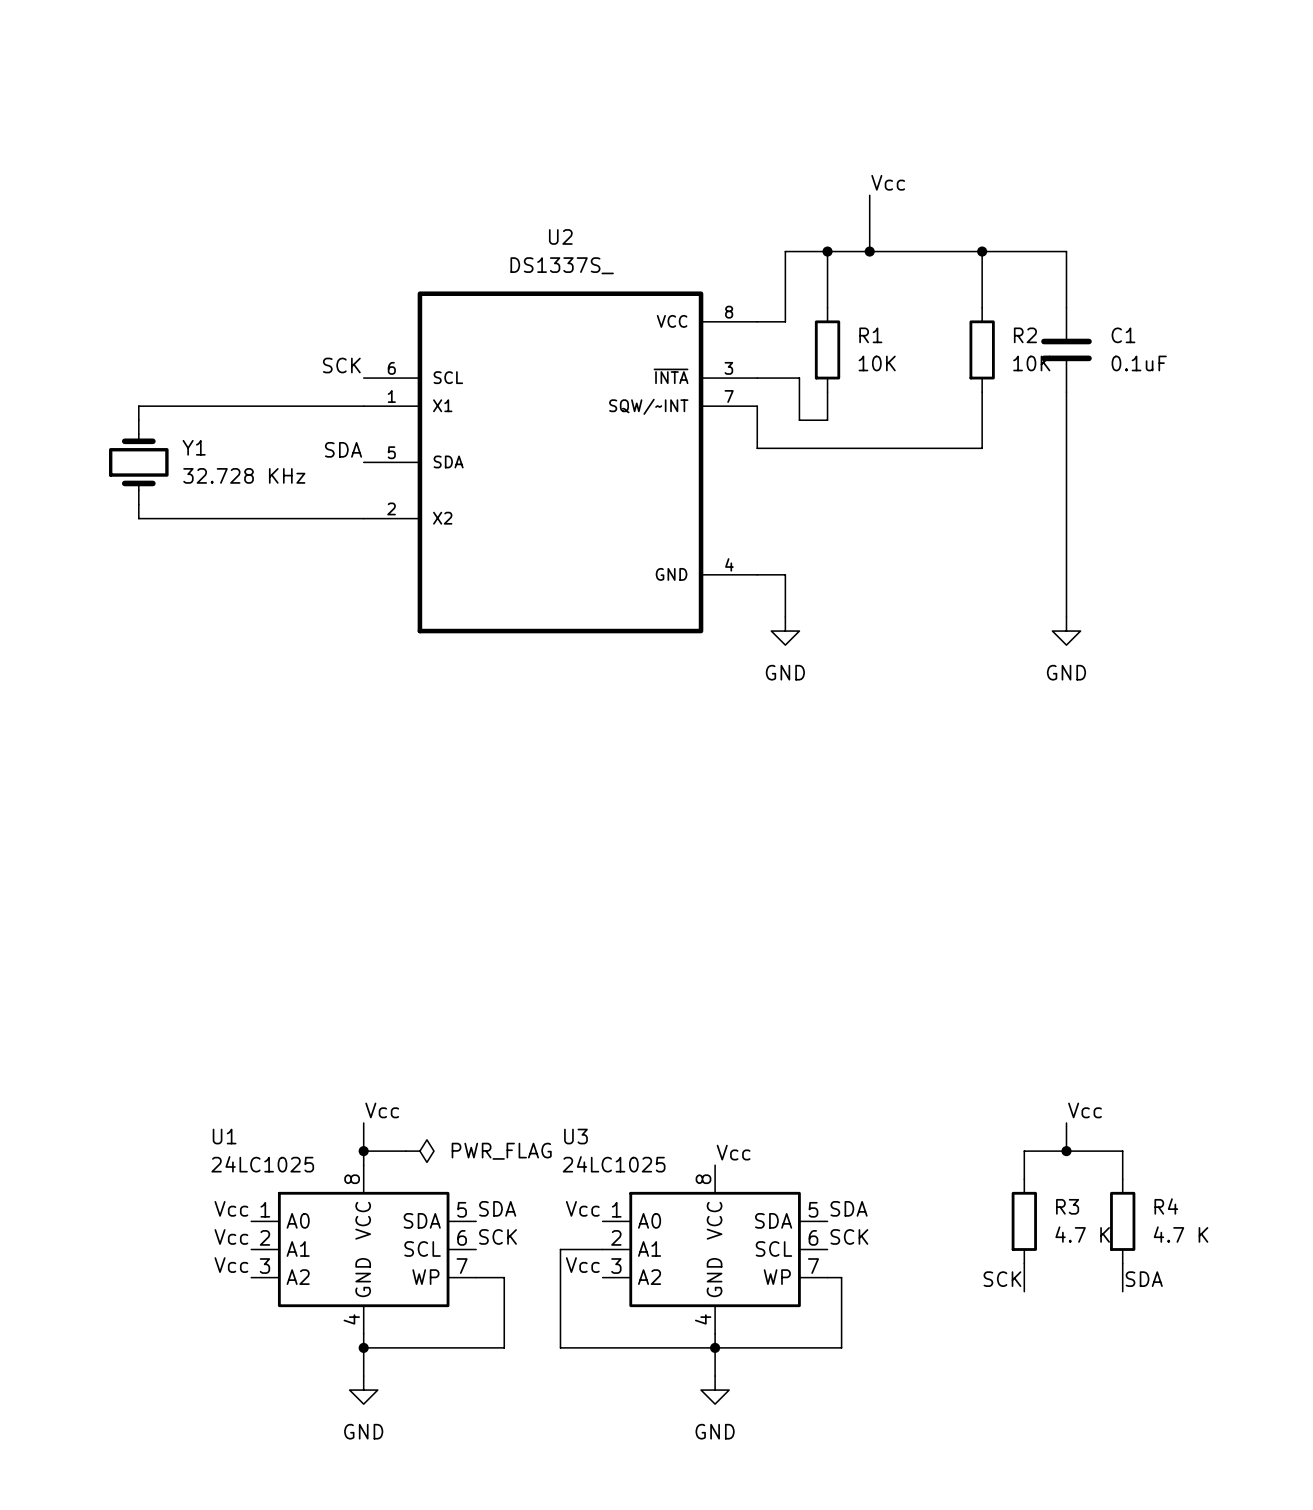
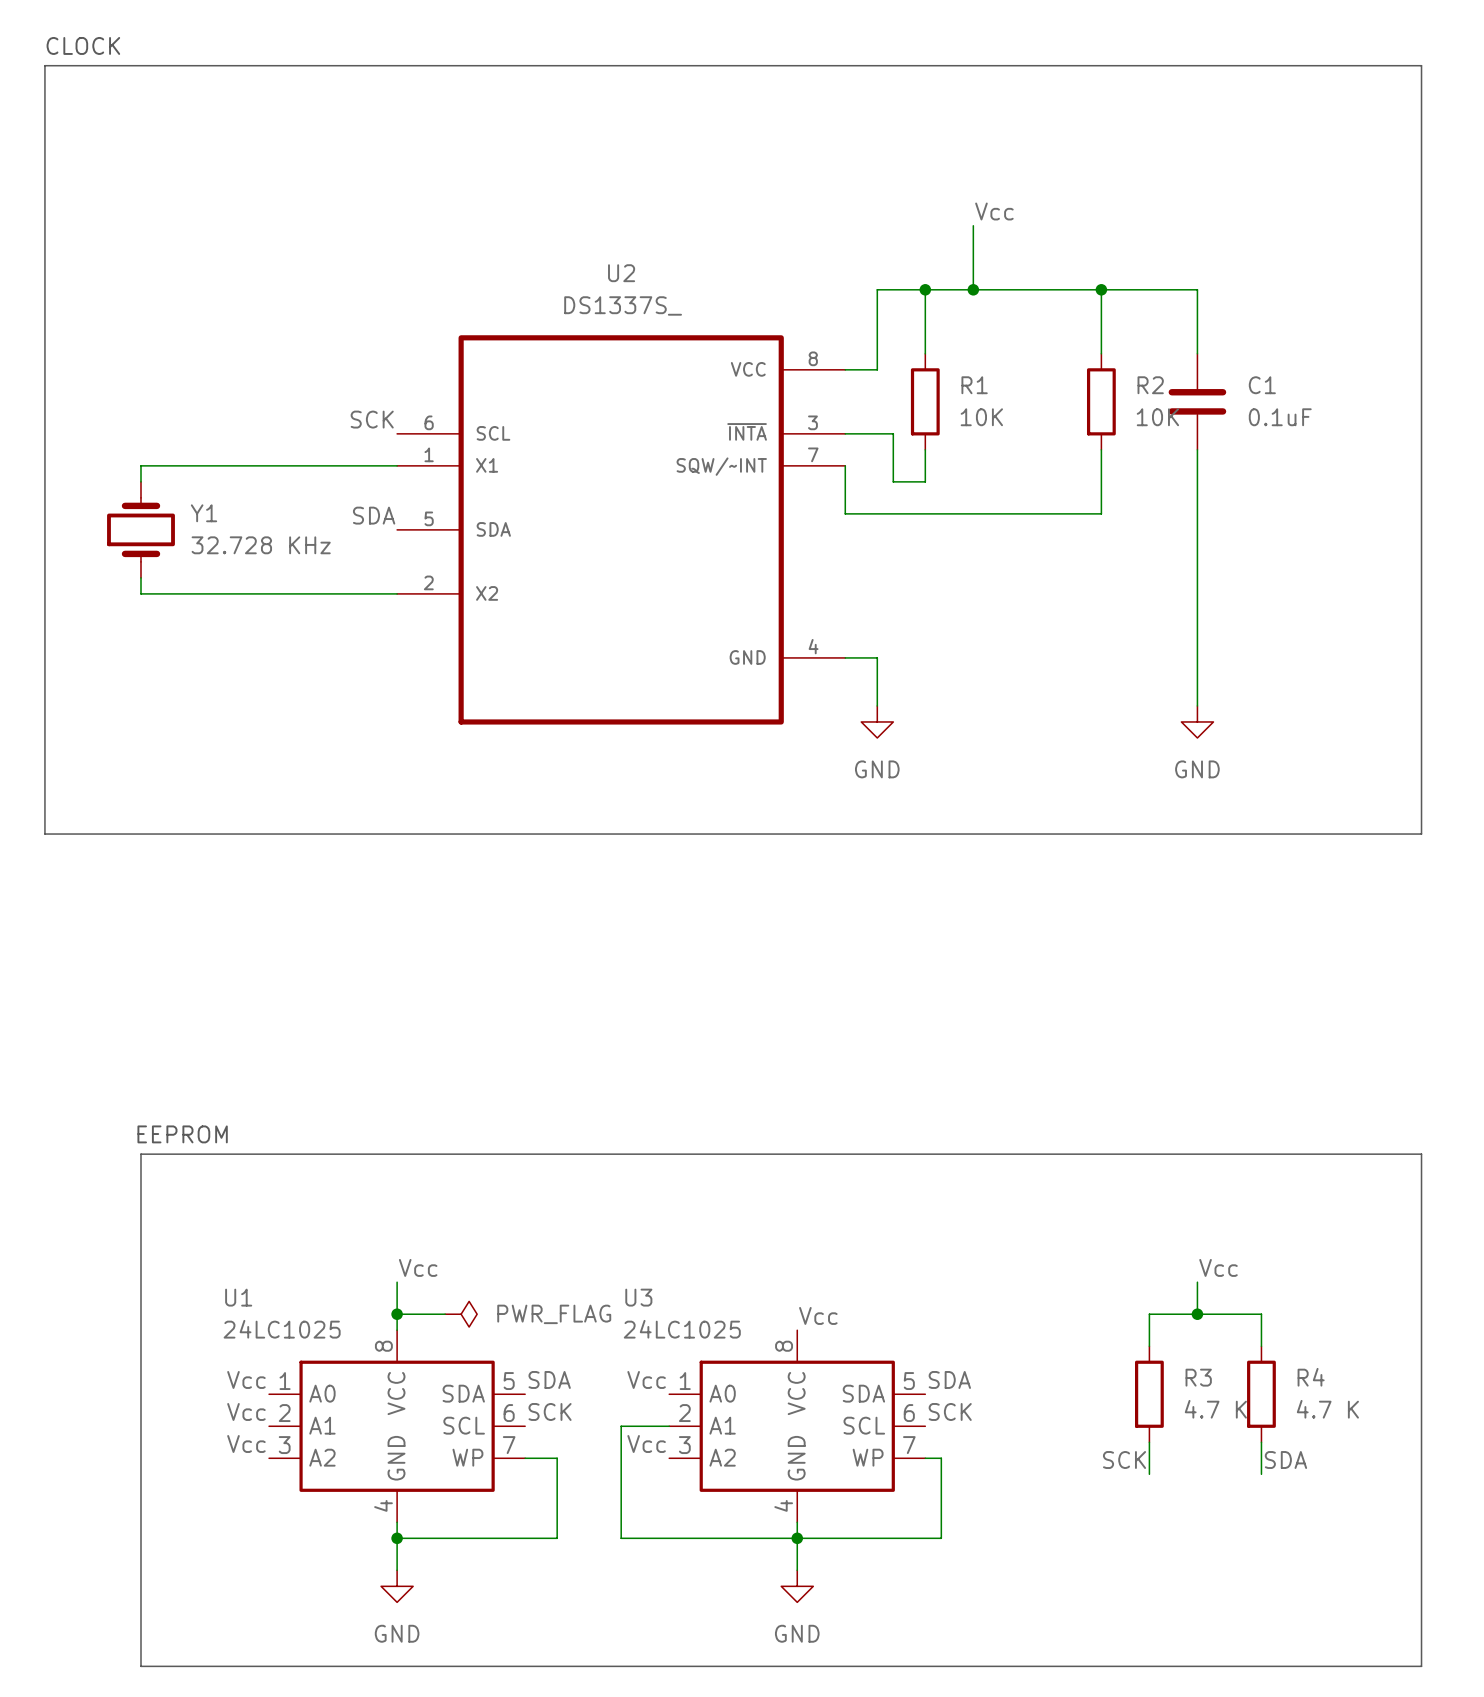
text: none -> CLOCK (83, 45)
line: none -> (44, 65) (1421, 65) (1421, 834) (44, 834) (44, 65)
text: none -> EEPROM (182, 1134)
line: none -> (140, 1154) (1421, 1154) (1421, 1666) (140, 1666) (140, 1154)

